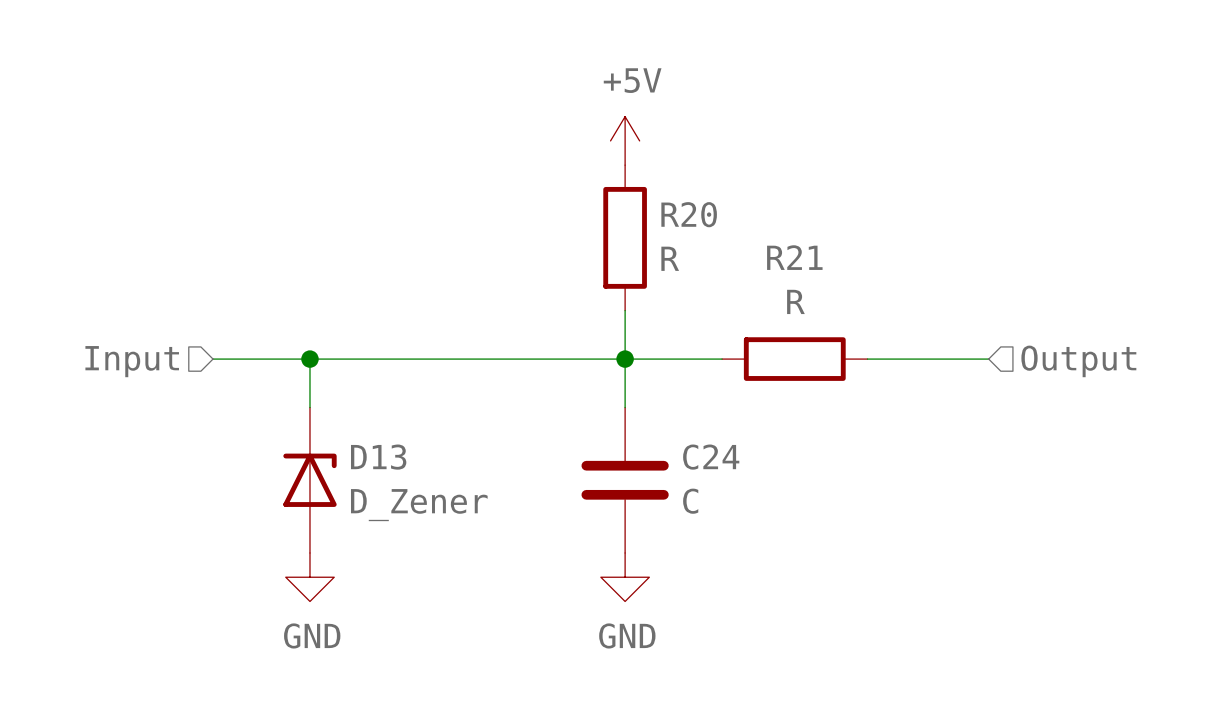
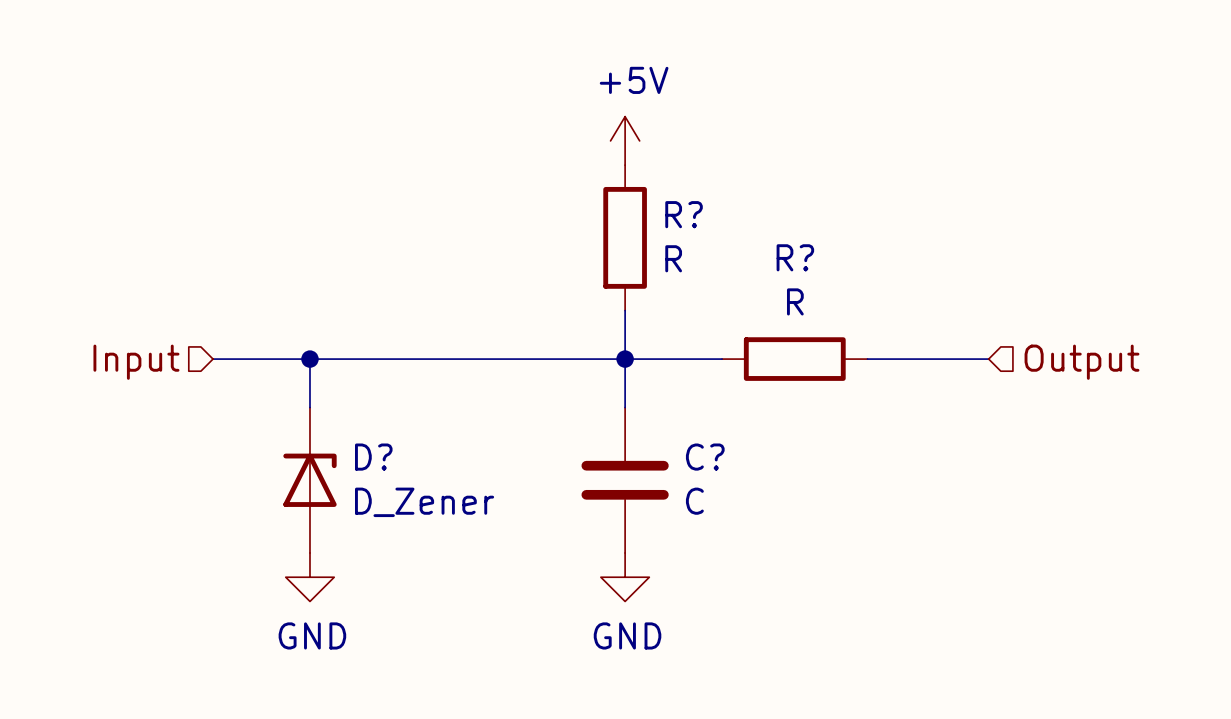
R20 name: R20 (689, 214) -> R? (684, 214)
R21 name: R21 (794, 257) -> R? (795, 257)
D13 name: D13 (378, 457) -> D? (373, 457)
C24 name: C24 (711, 457) -> C? (705, 457)

